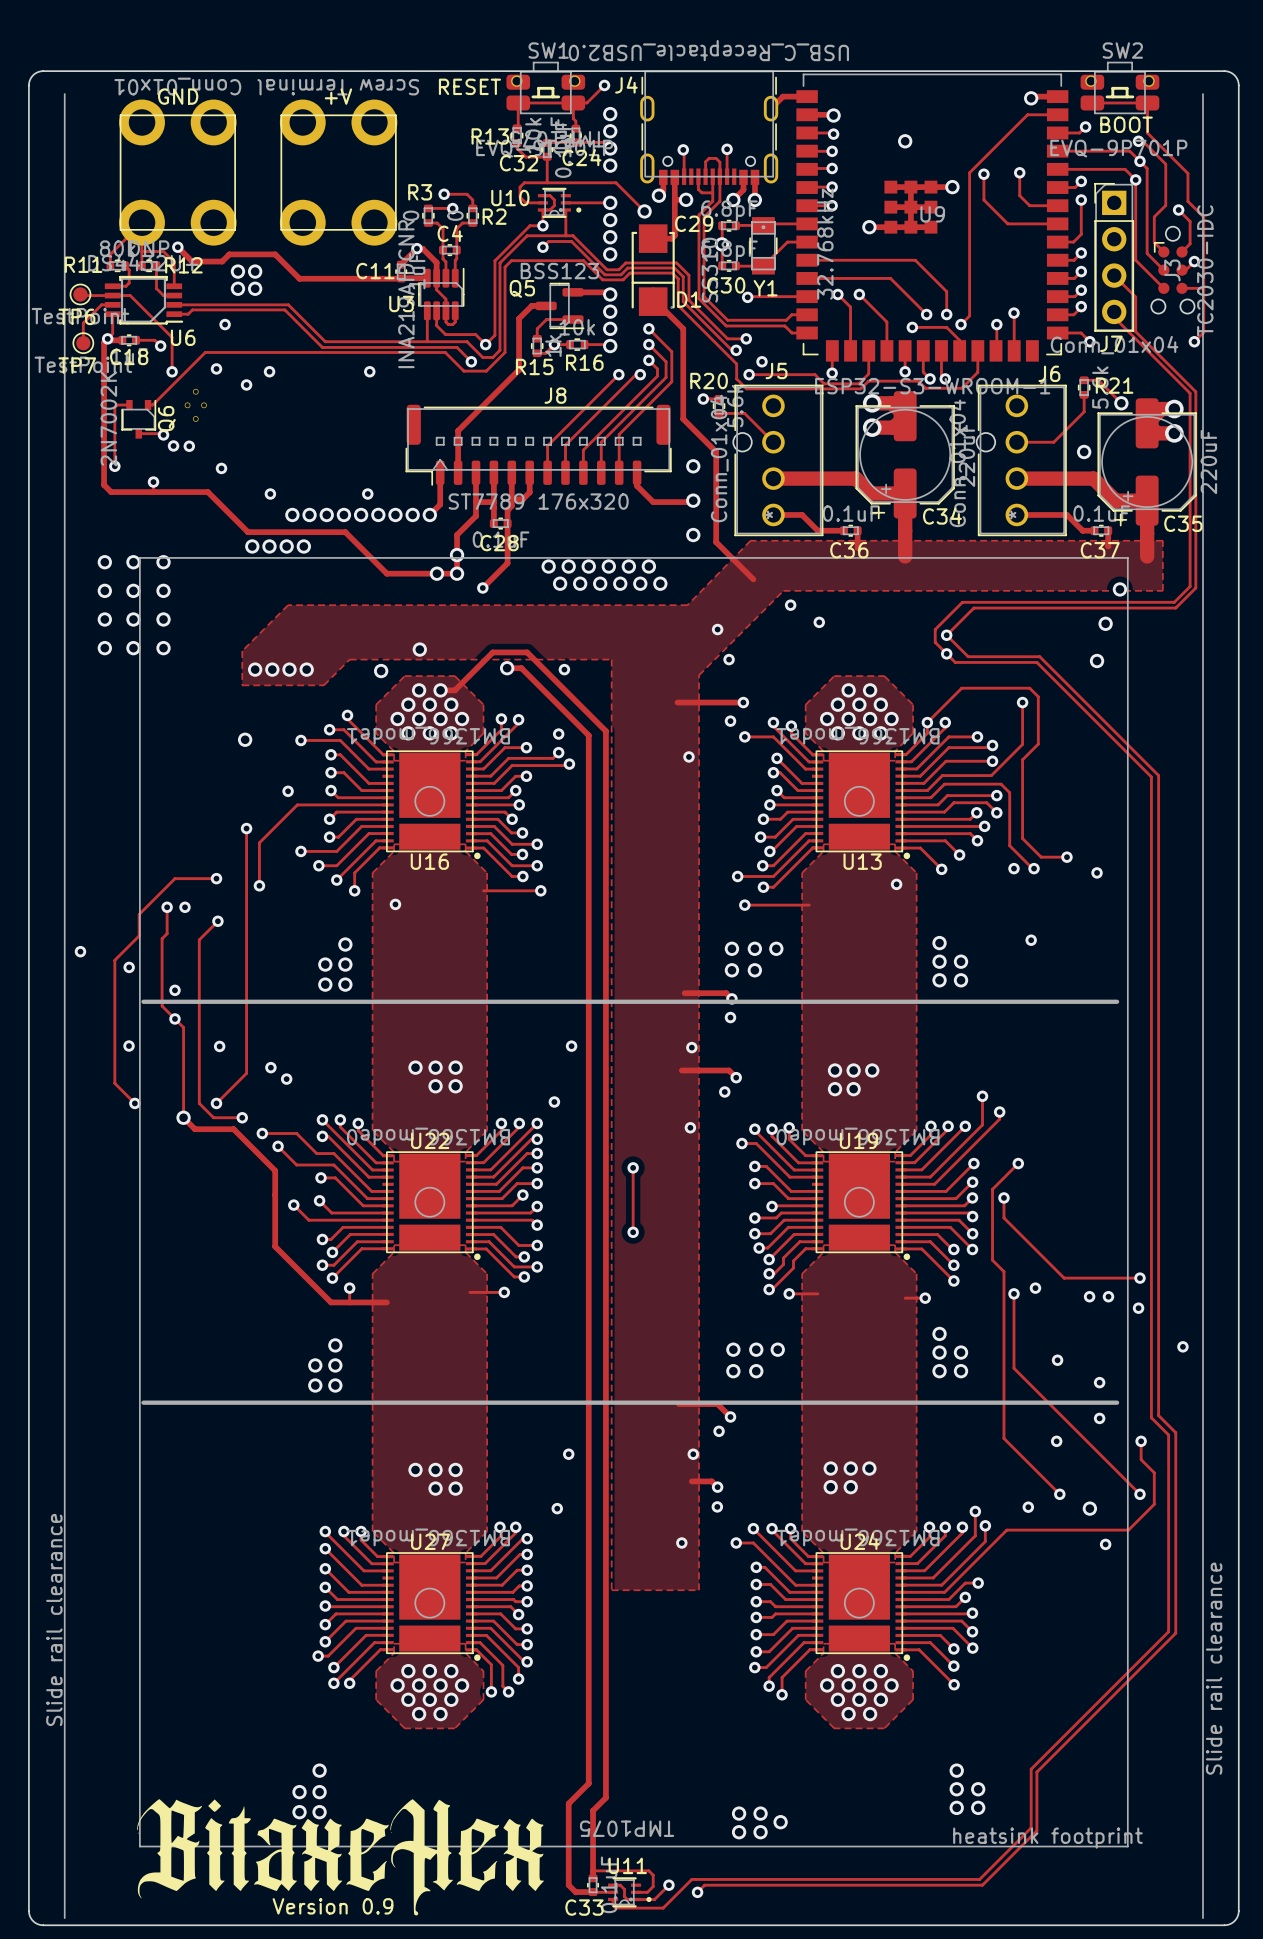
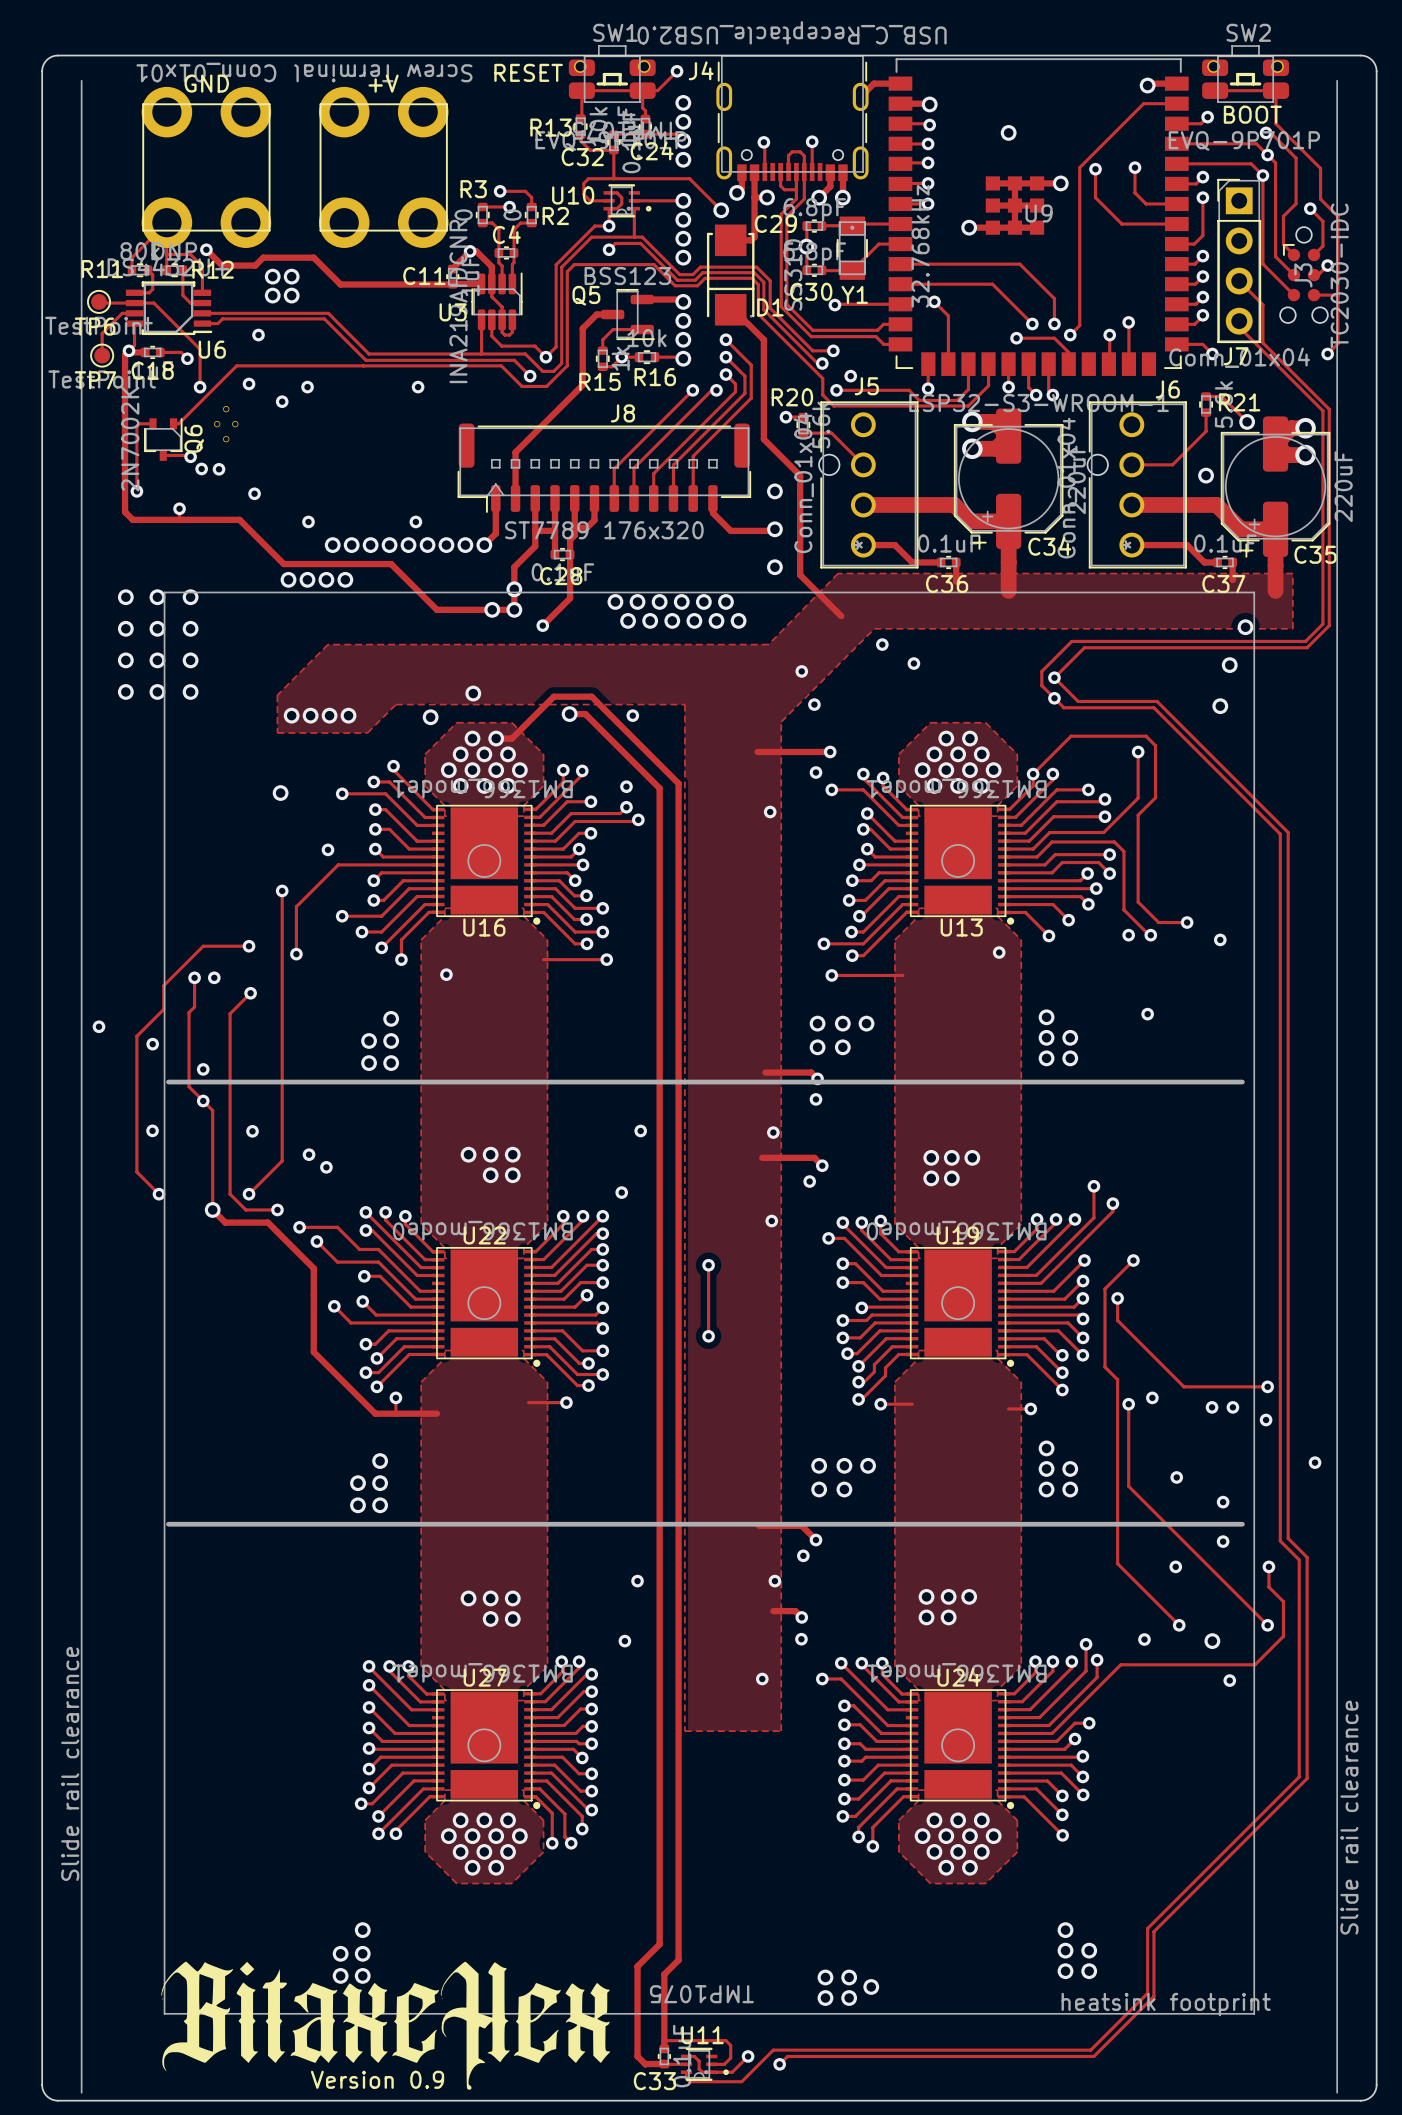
track: (859, 294) (886, 322) (886, 350) -> none
via: (859, 294) -> none
track: (977, 350) (977, 372) (961, 388) (925, 388) (918, 381) (868, 381) (860, 388) -> (988, 364) (988, 385) (968, 406) (959, 406)

